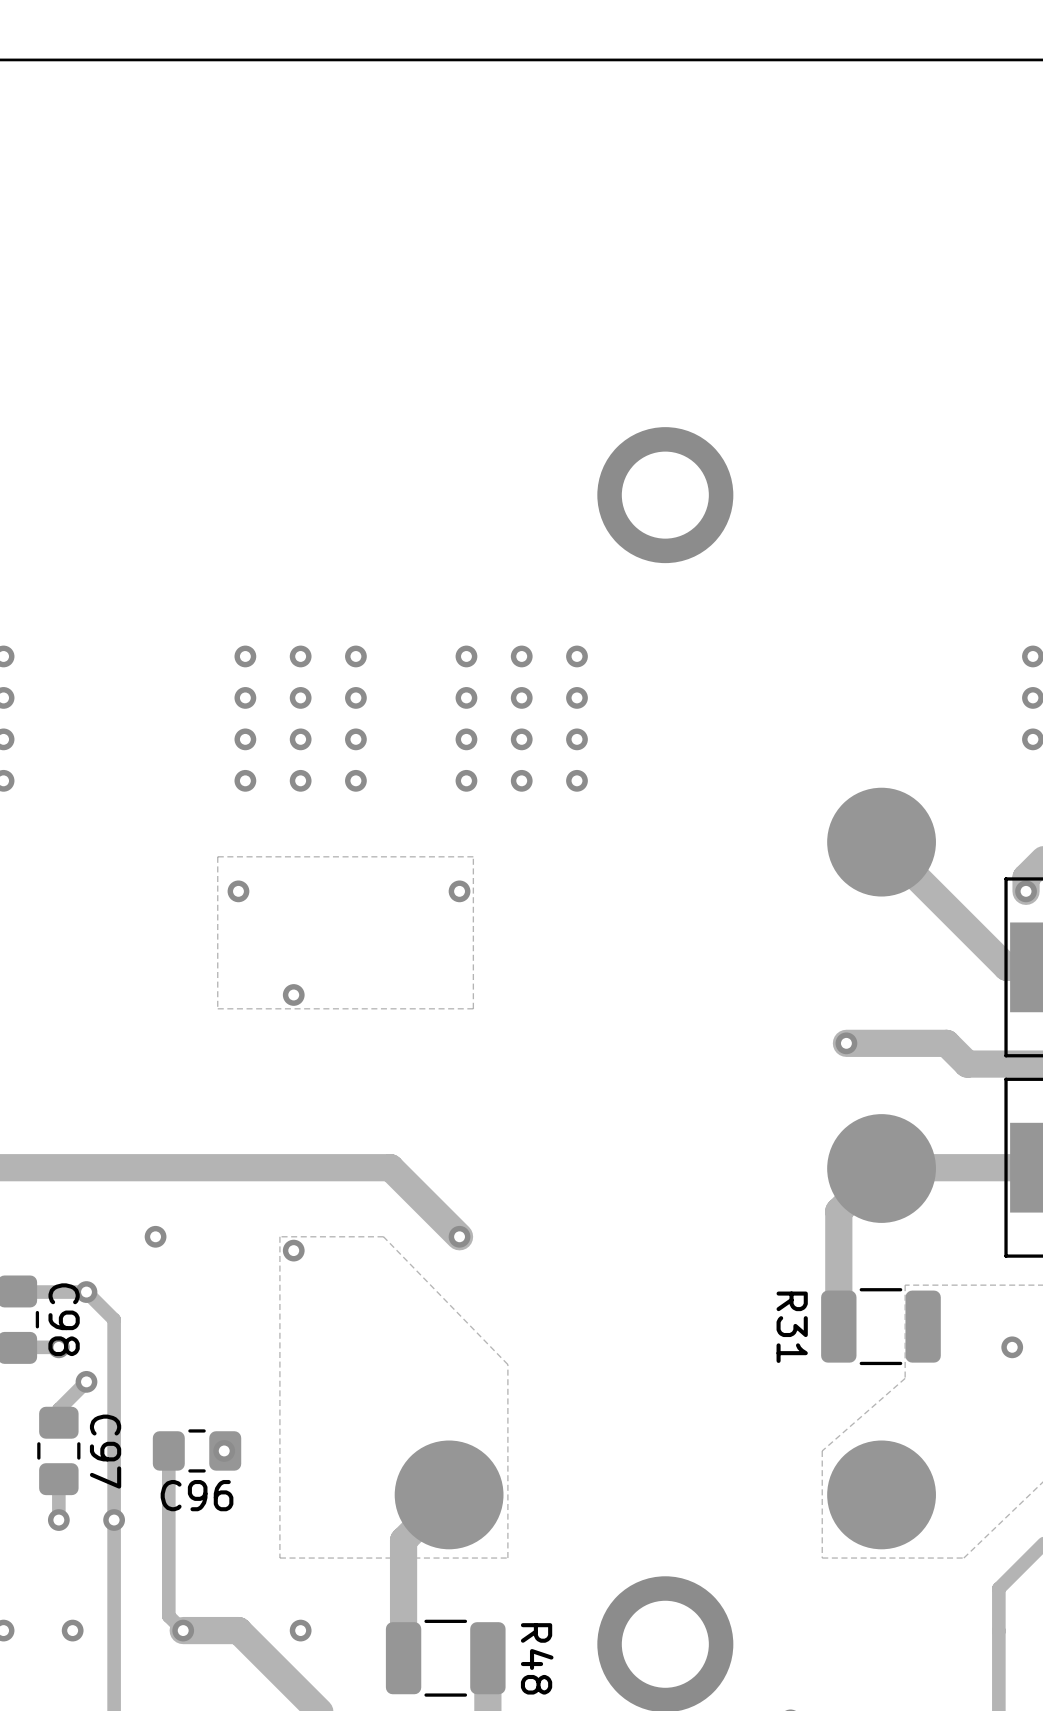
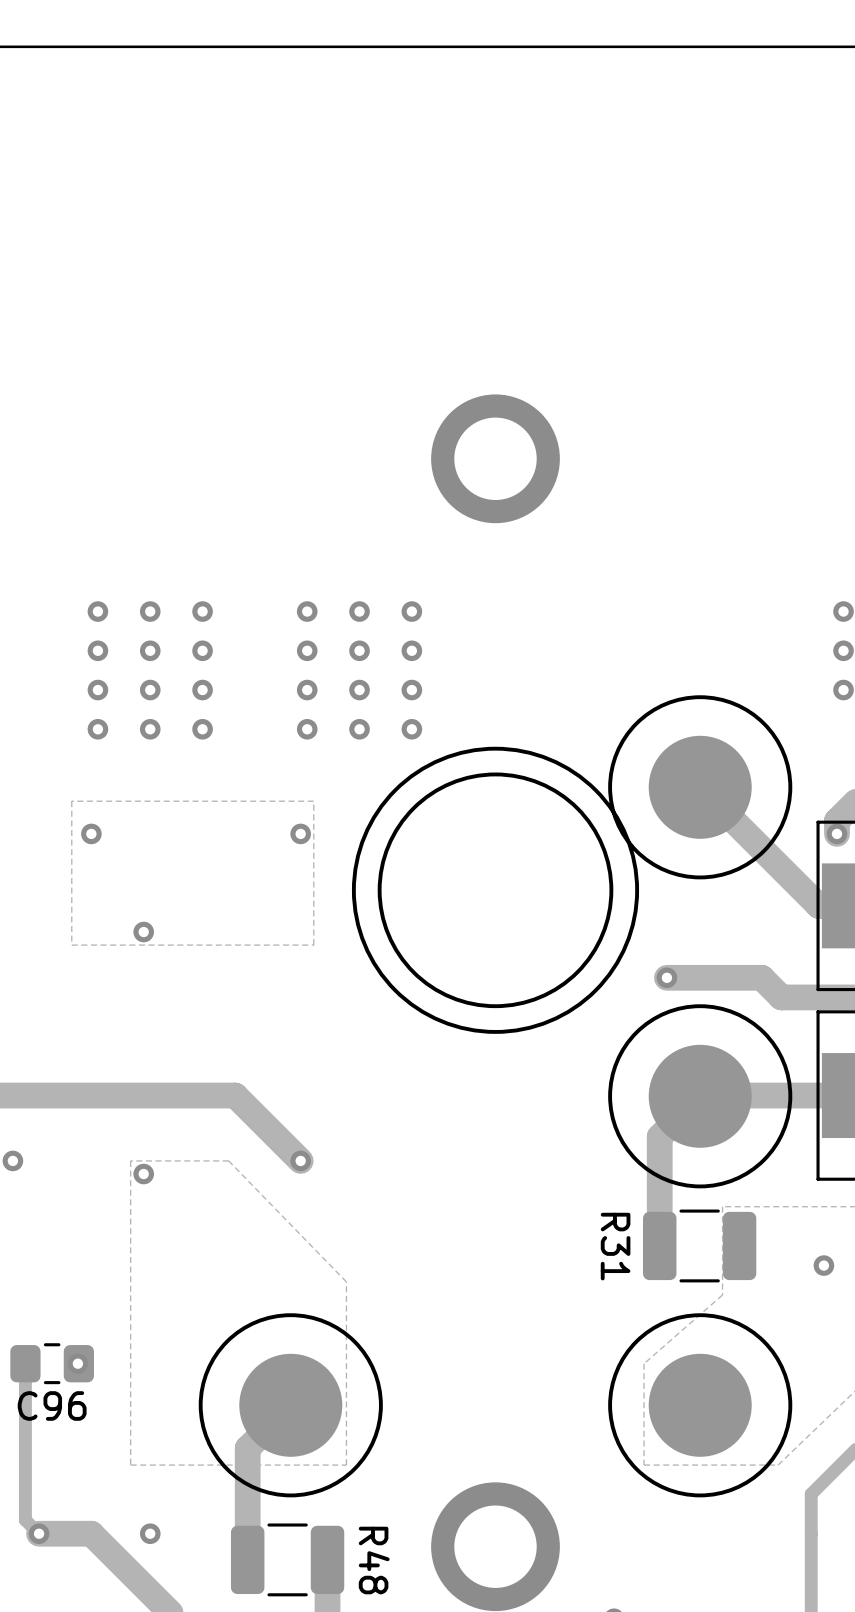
drawing: none -> [351, 695, 793, 1189]
drawing: none -> [198, 1313, 383, 1498]
drawing: none -> [608, 1313, 793, 1498]

